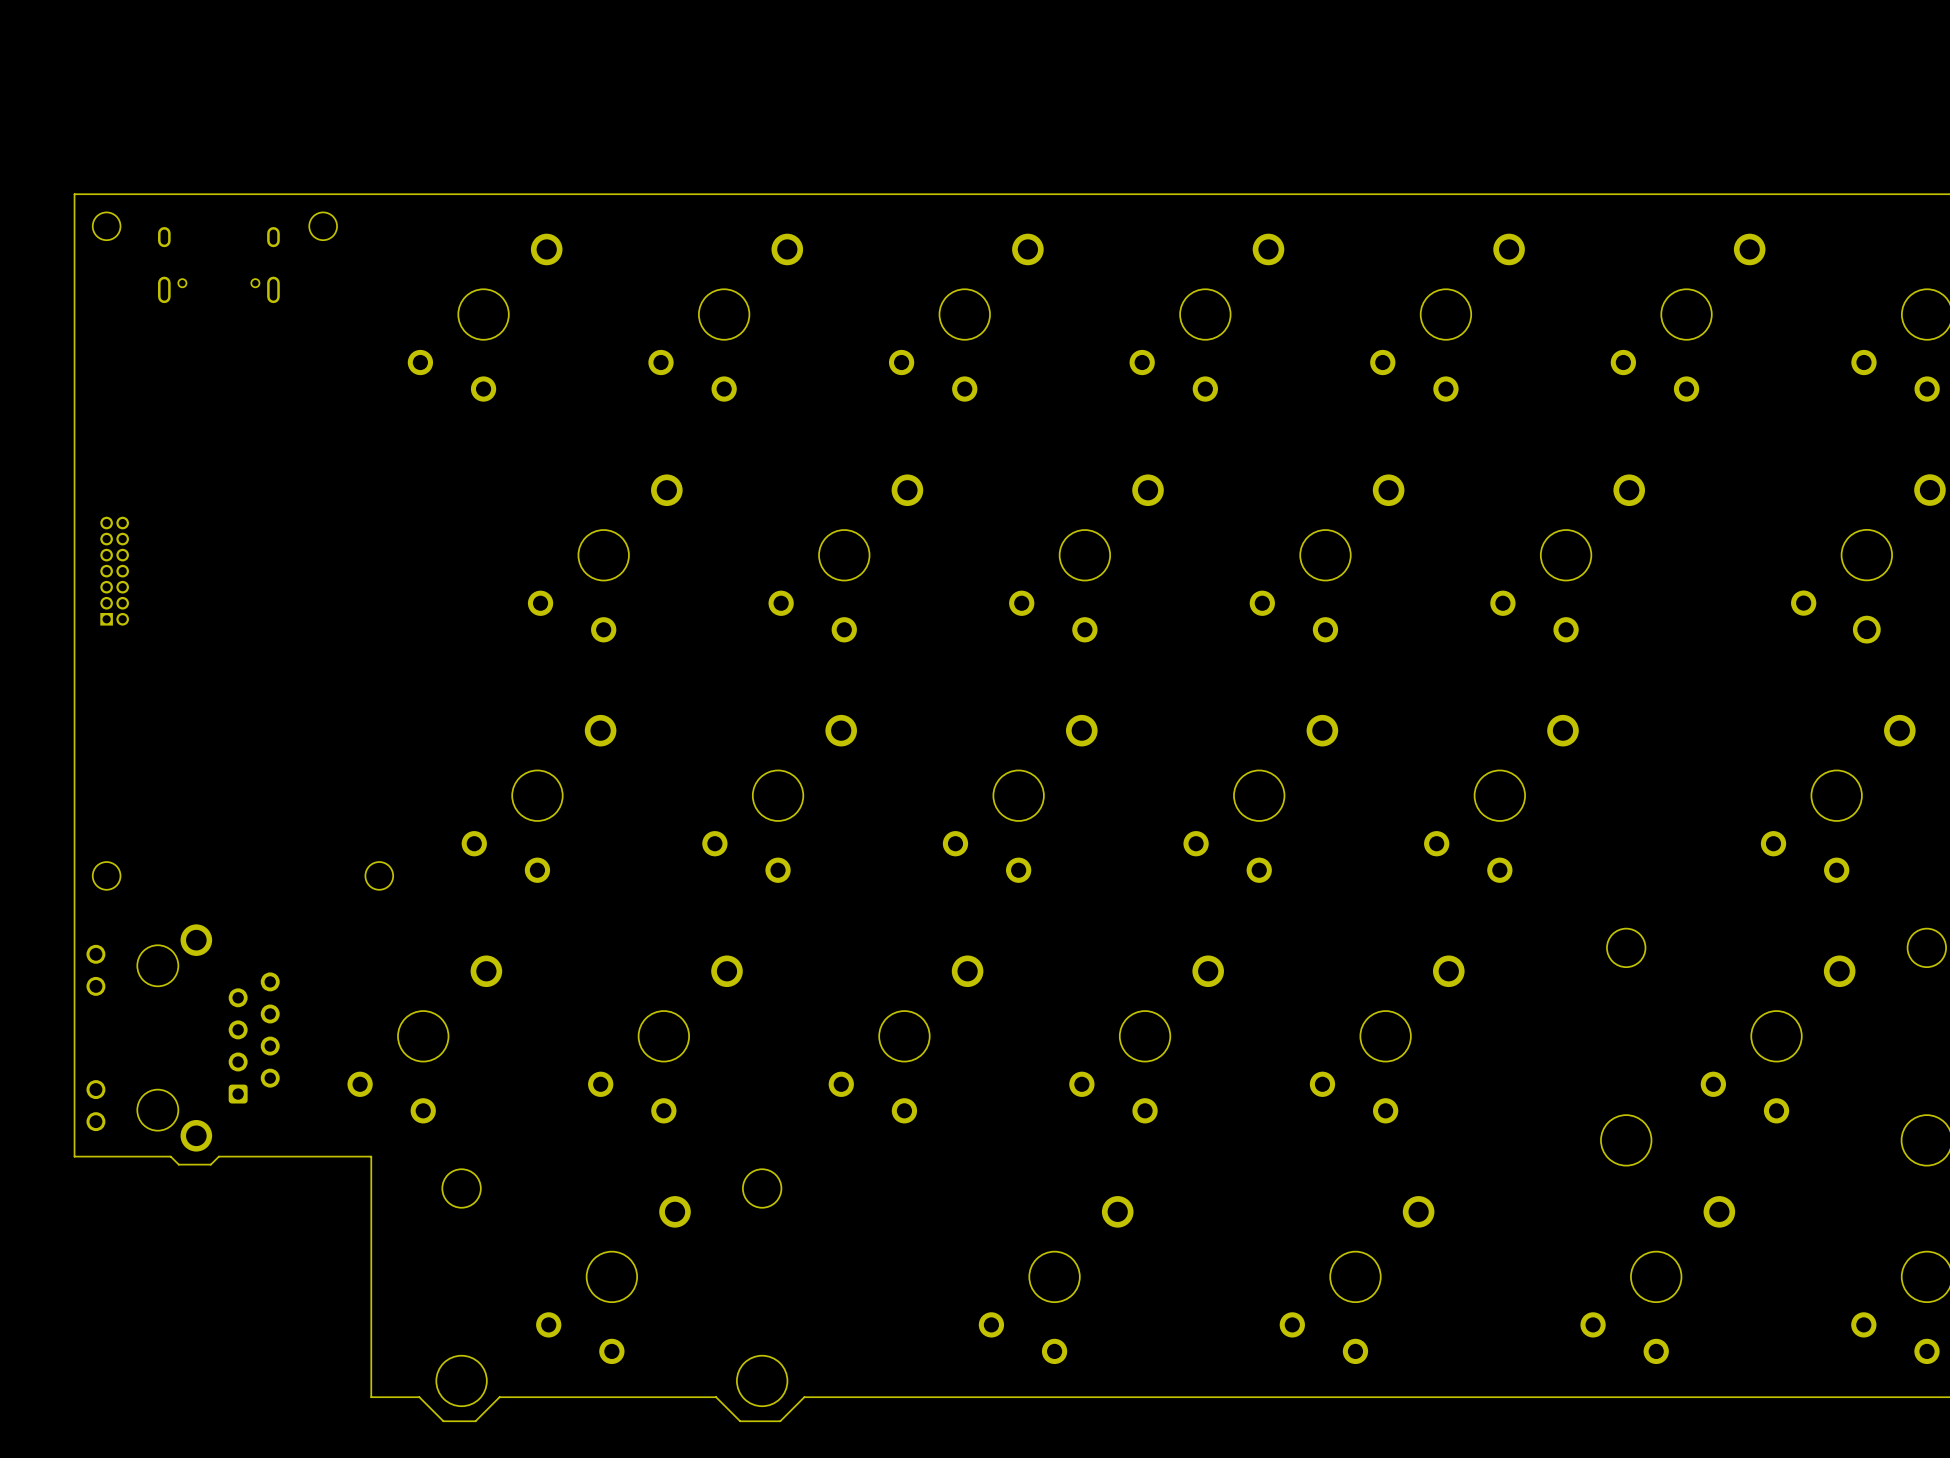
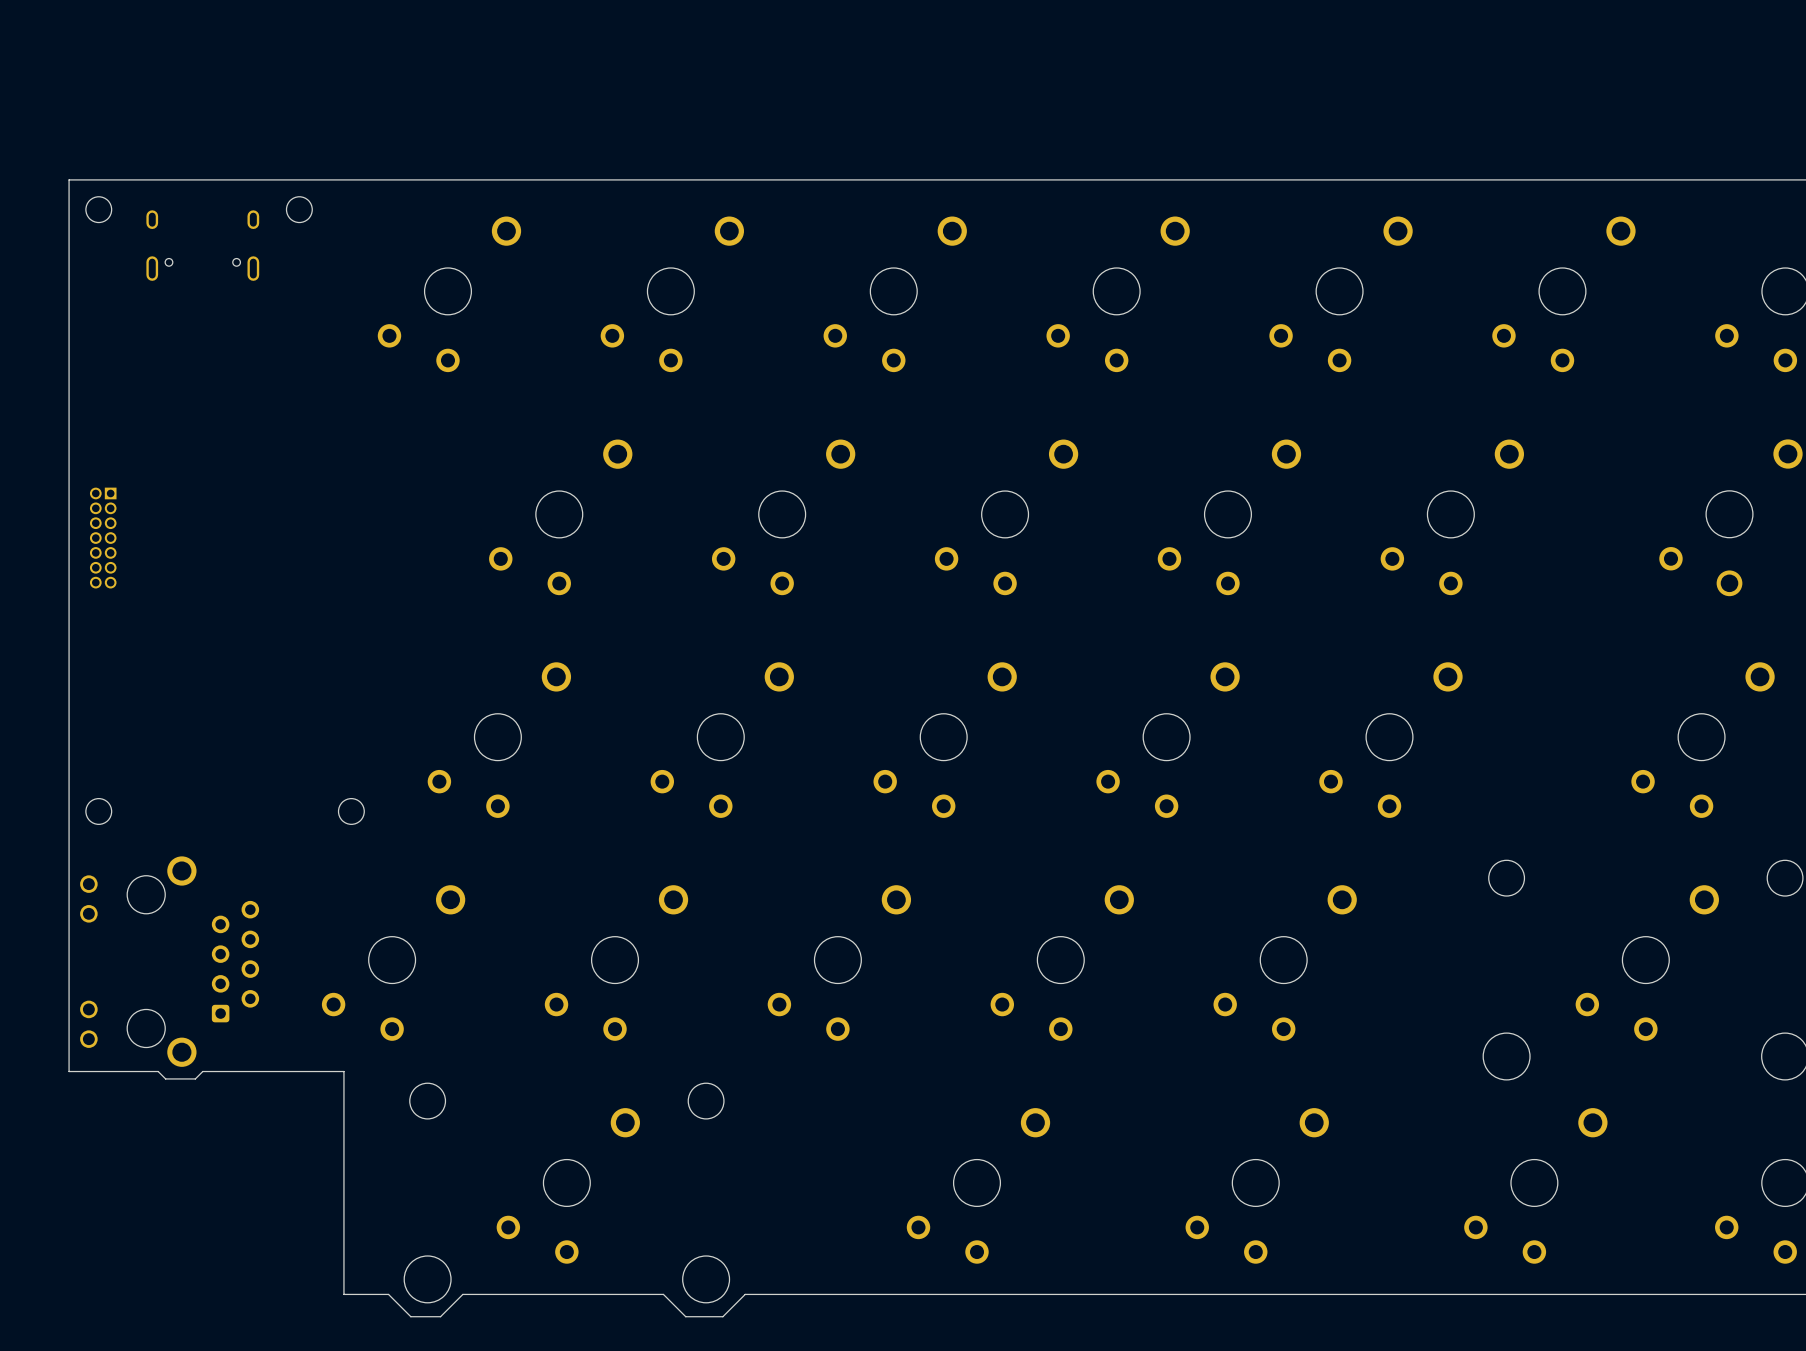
part rotation: 0° (114, 571) -> 180° (103, 538)

